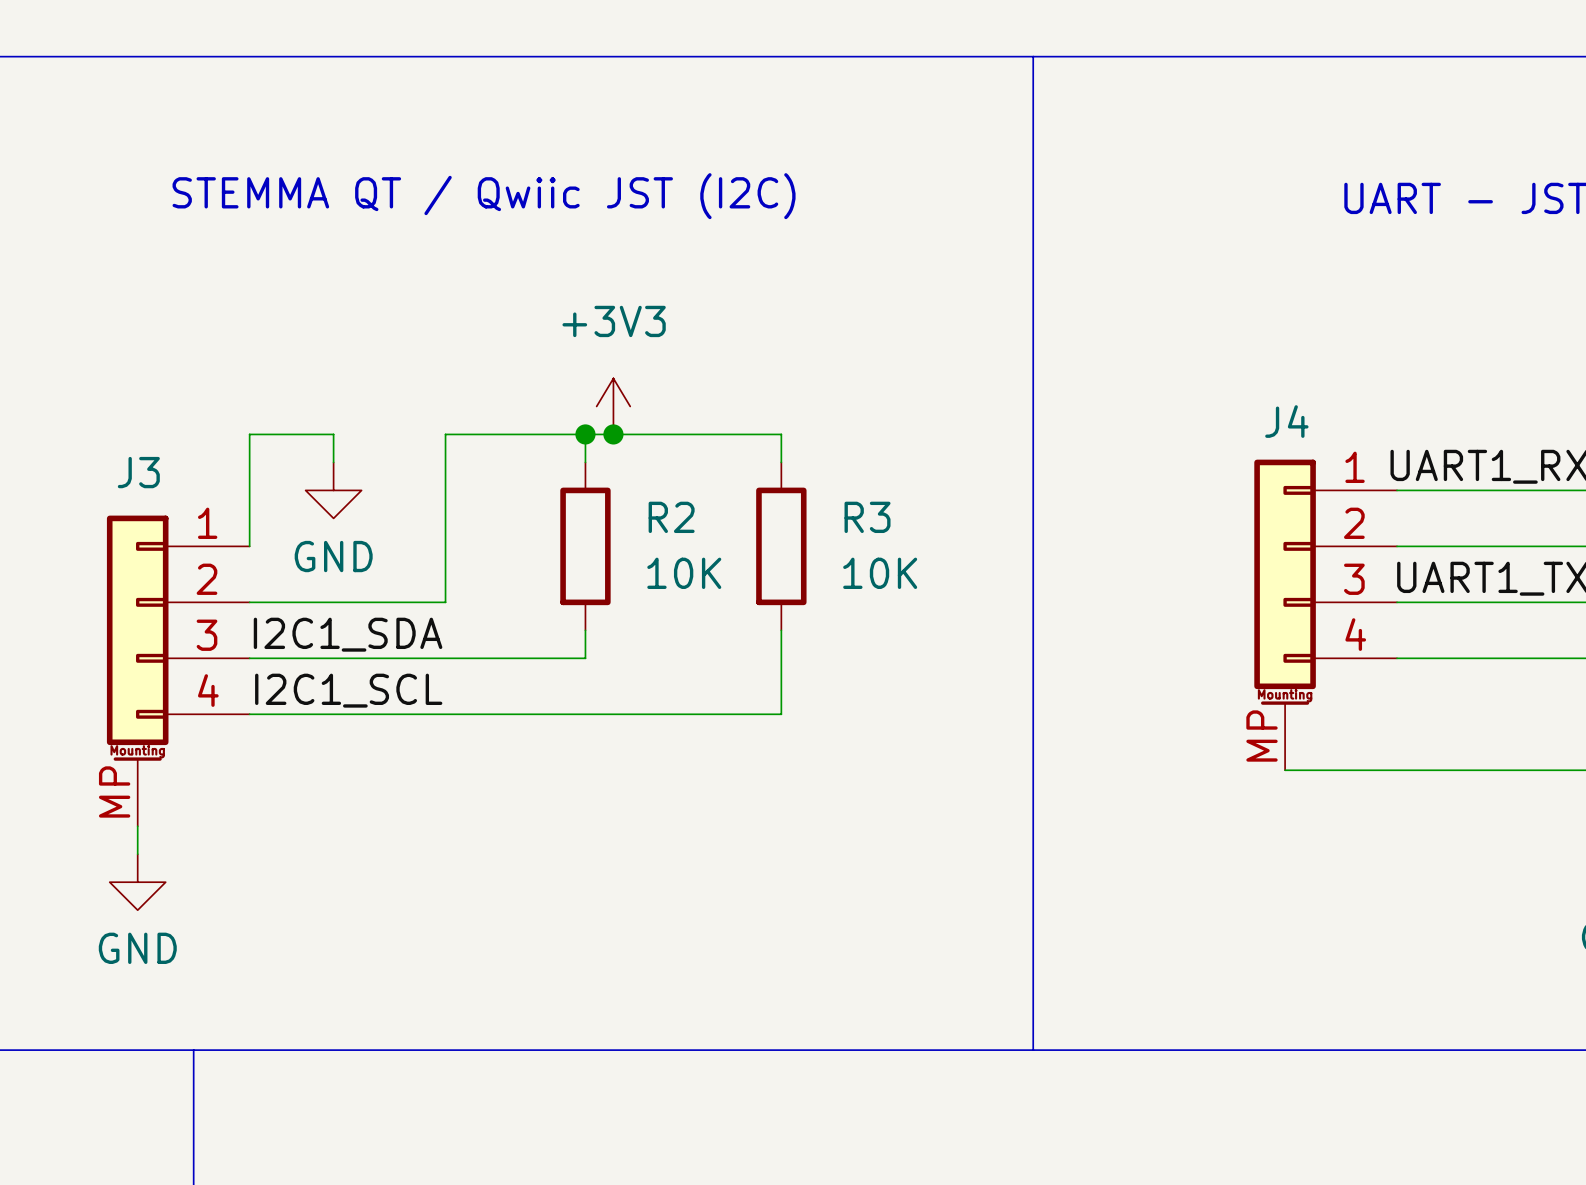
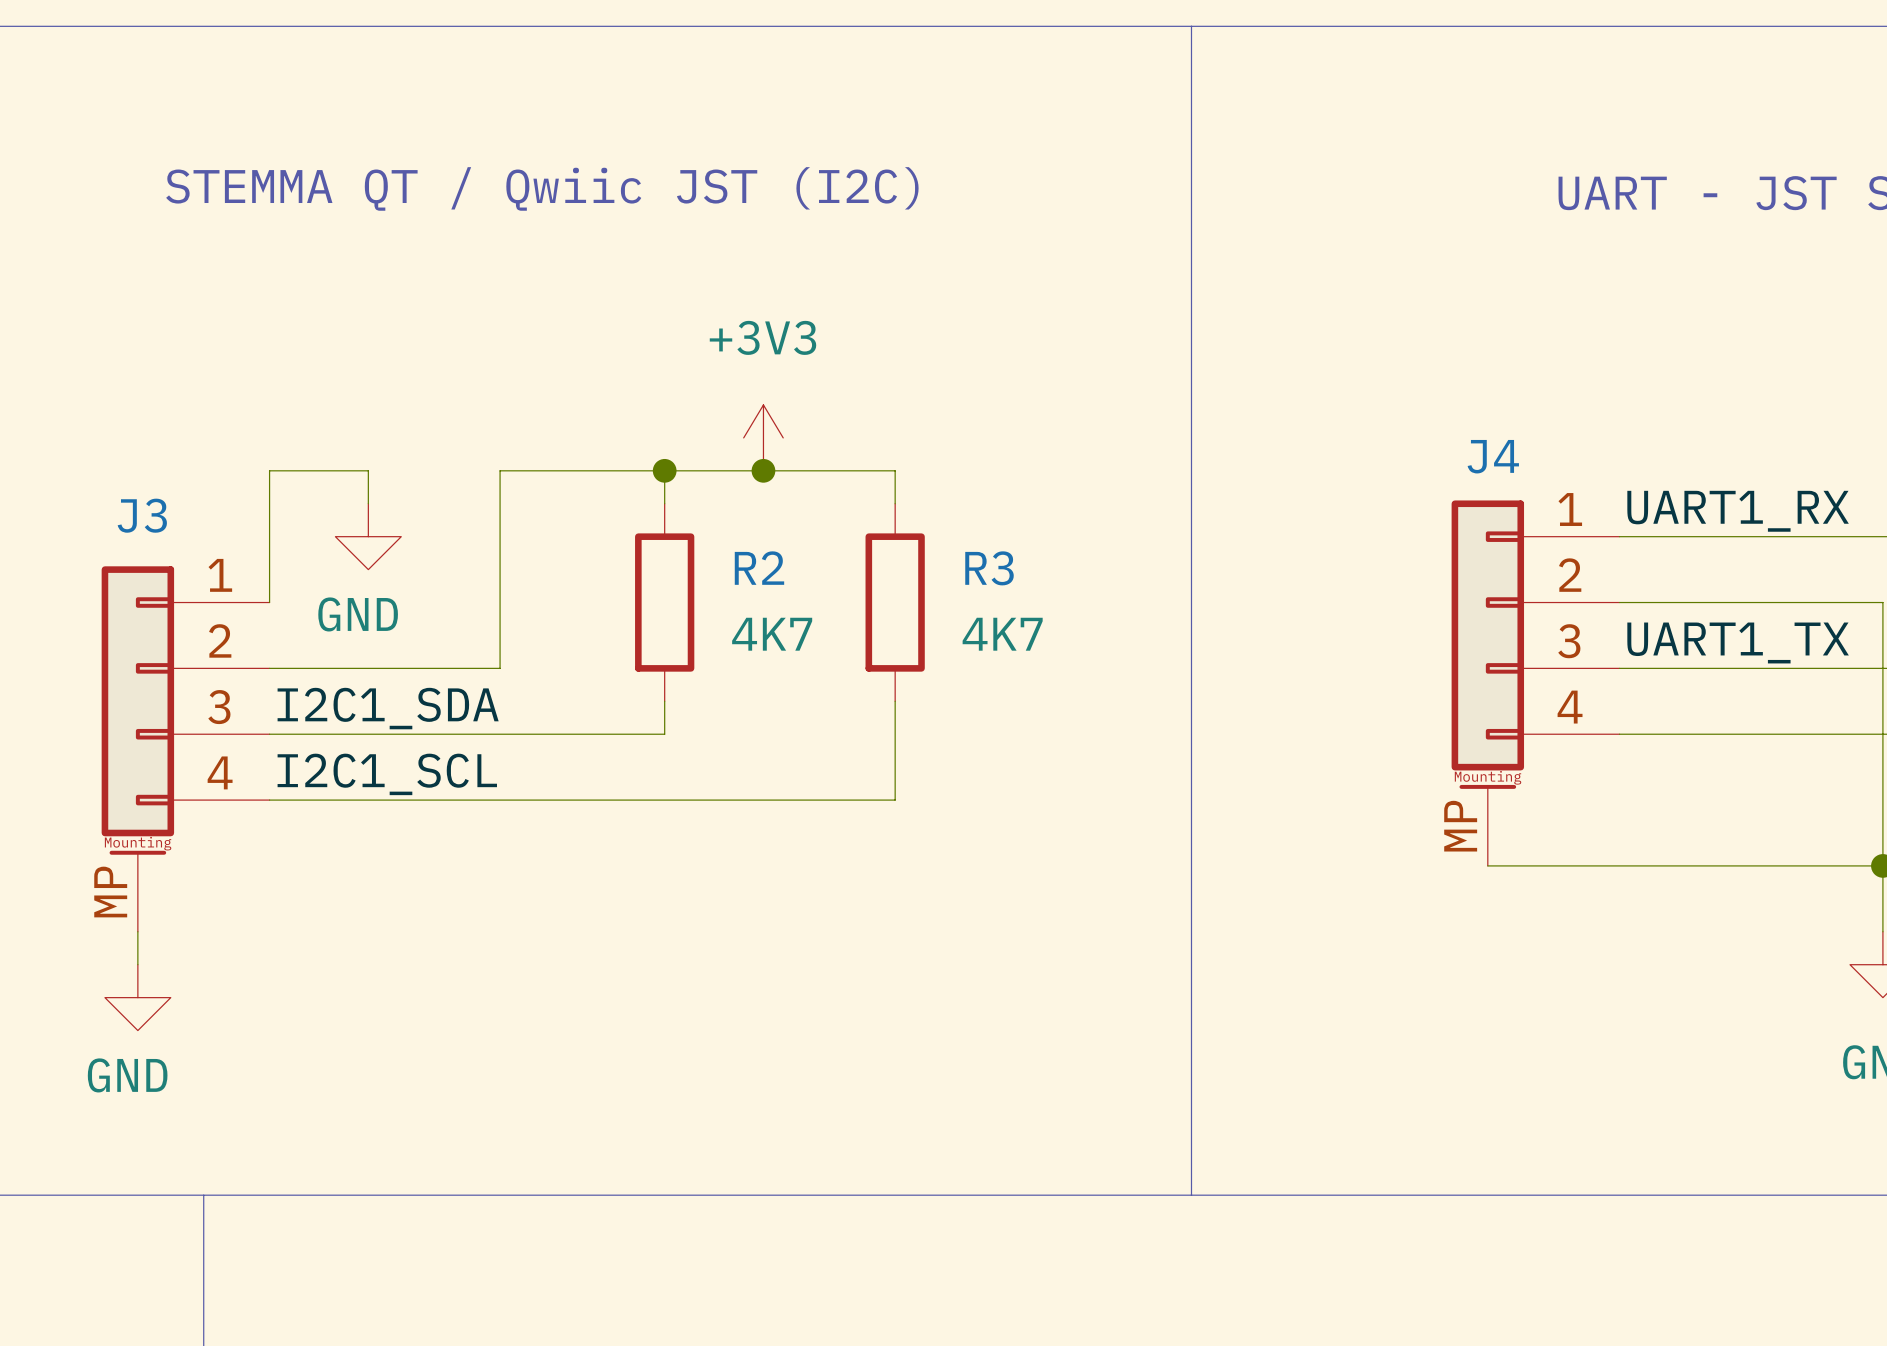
power symbol position: +3V3 (613, 406) -> +3V3 (763, 437)
junction position: (613, 434) -> (763, 470)
R2 value: 10K (684, 573) -> 4K7 (772, 634)
R3 value: 10K (880, 573) -> 4K7 (1002, 634)

